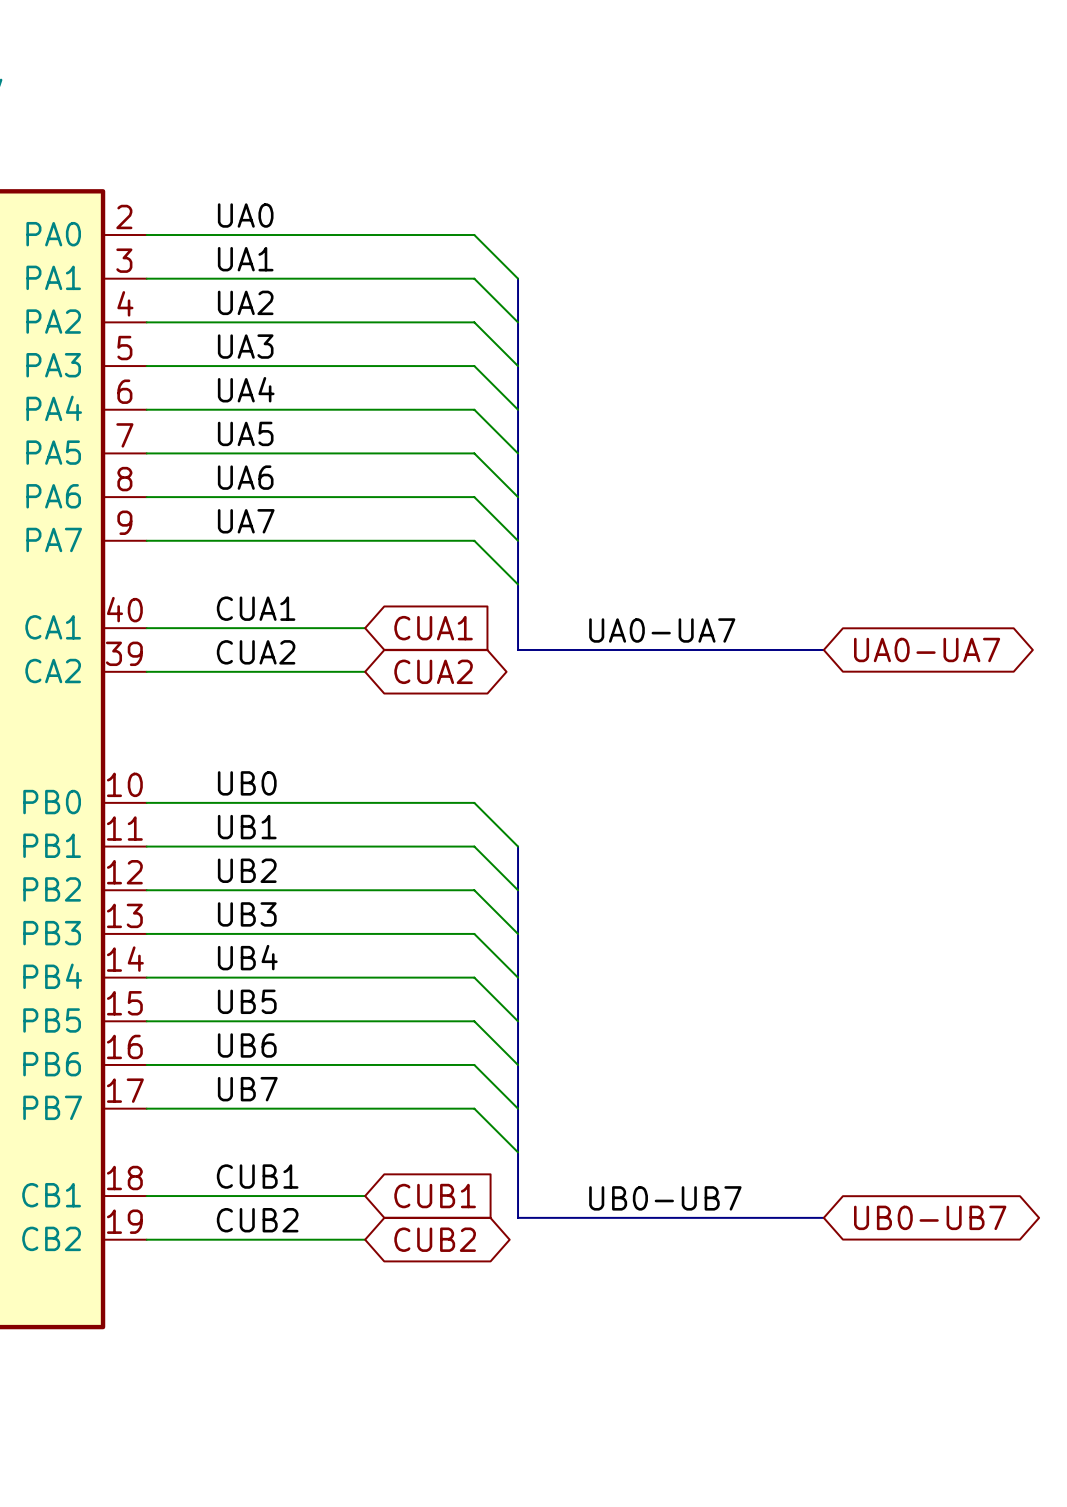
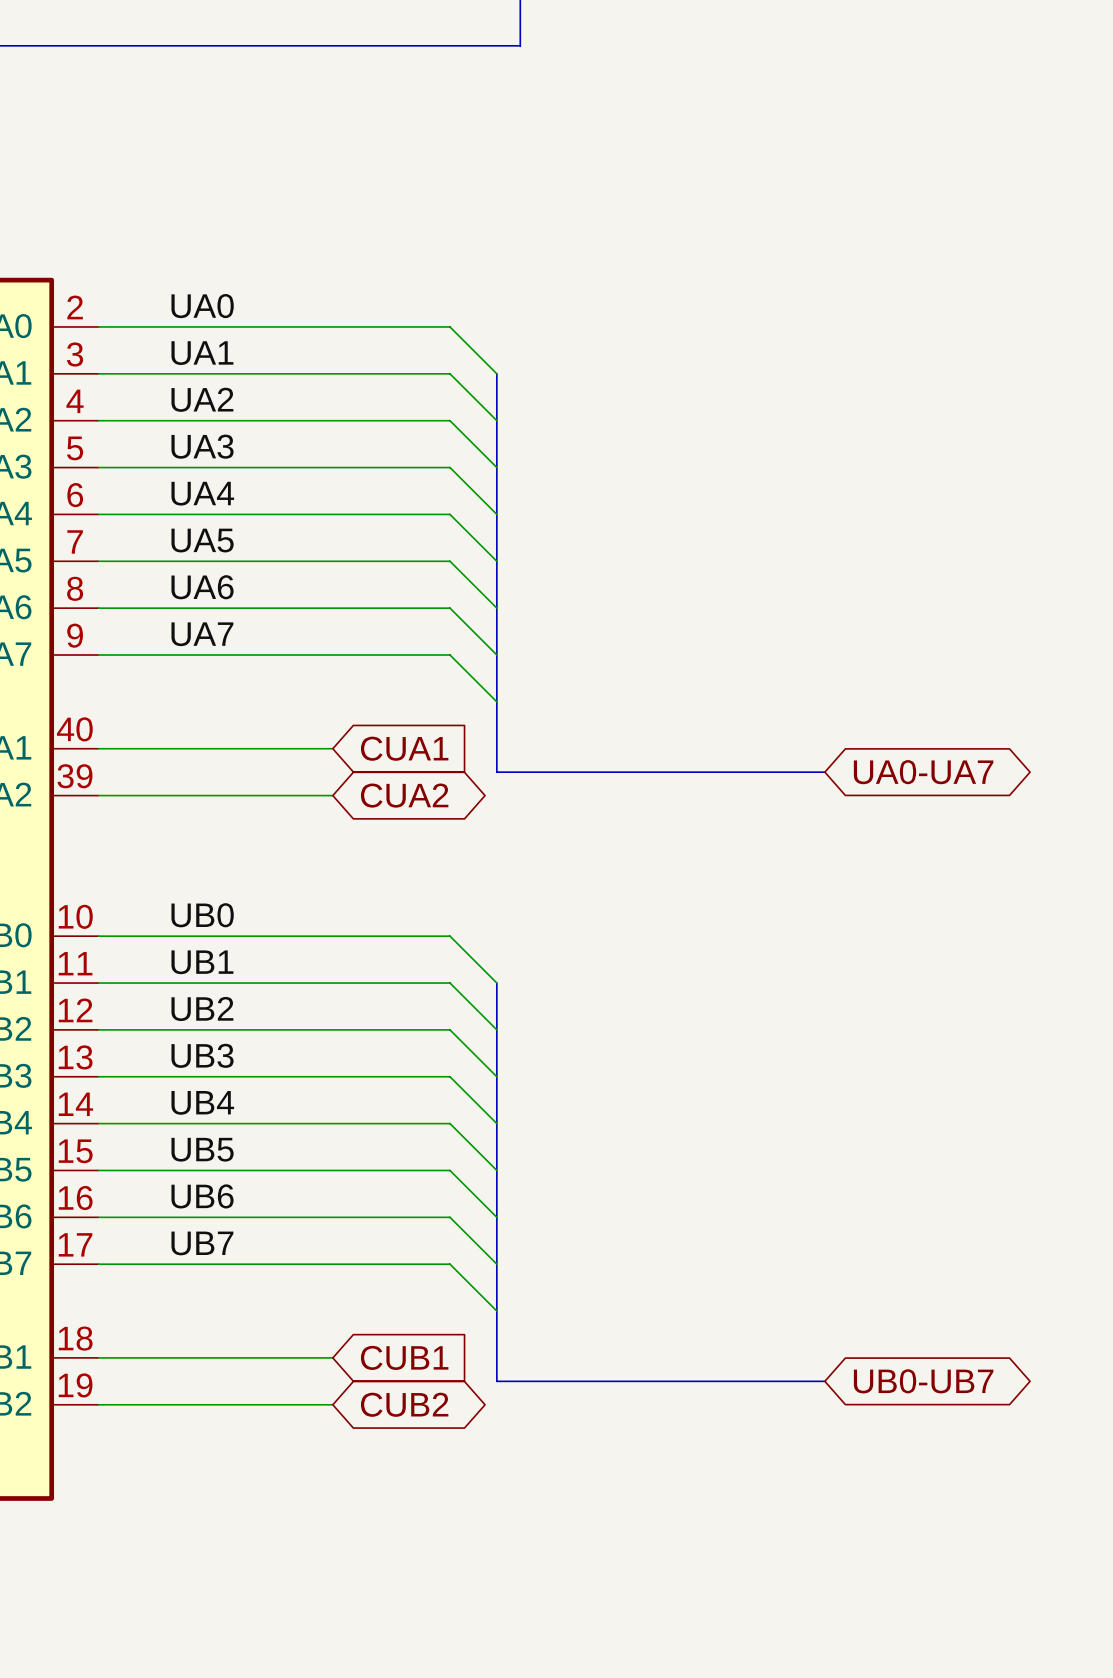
label: CUA1 (256, 608) -> none
label: UA0-UA7 (662, 630) -> none
label: CUA2 (256, 652) -> none
label: CUB1 (257, 1176) -> none
label: UB0-UB7 (665, 1198) -> none
label: CUB2 (257, 1220) -> none

